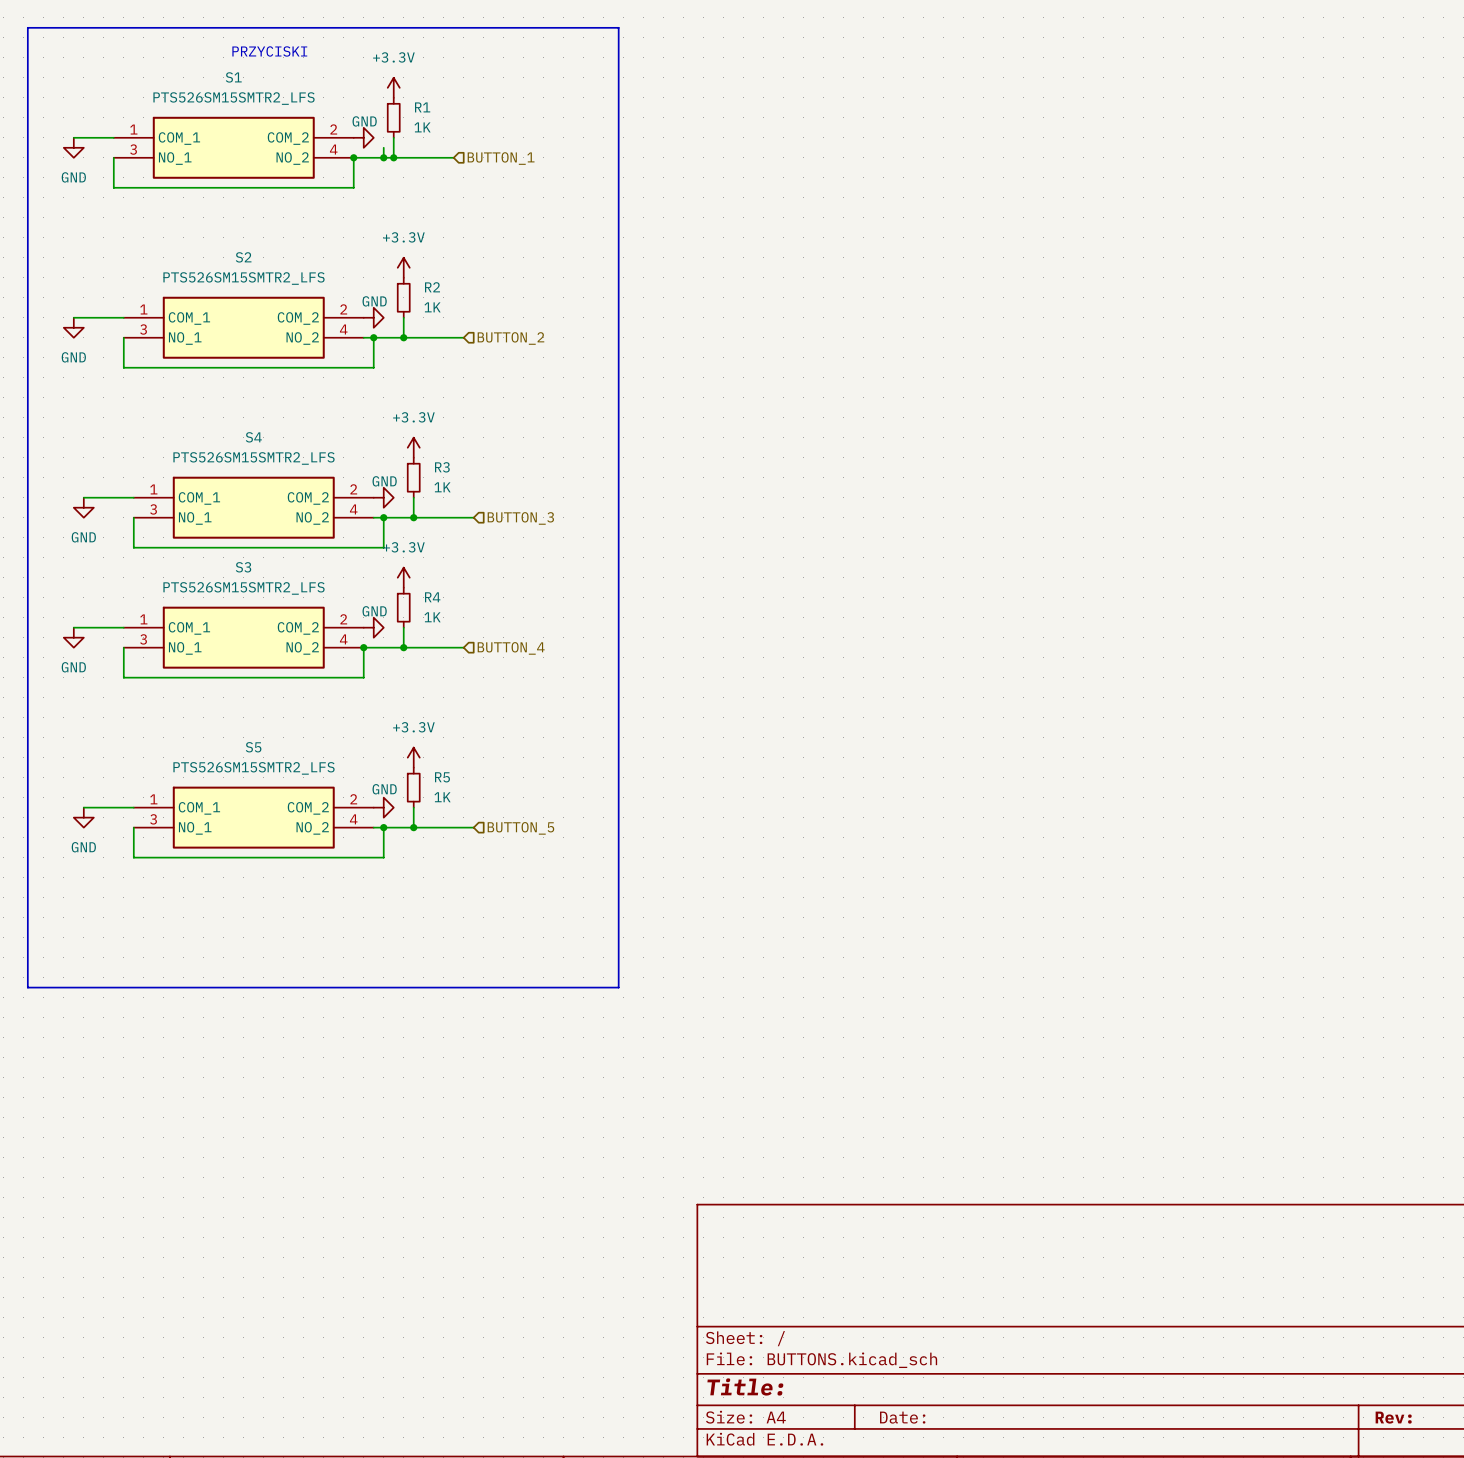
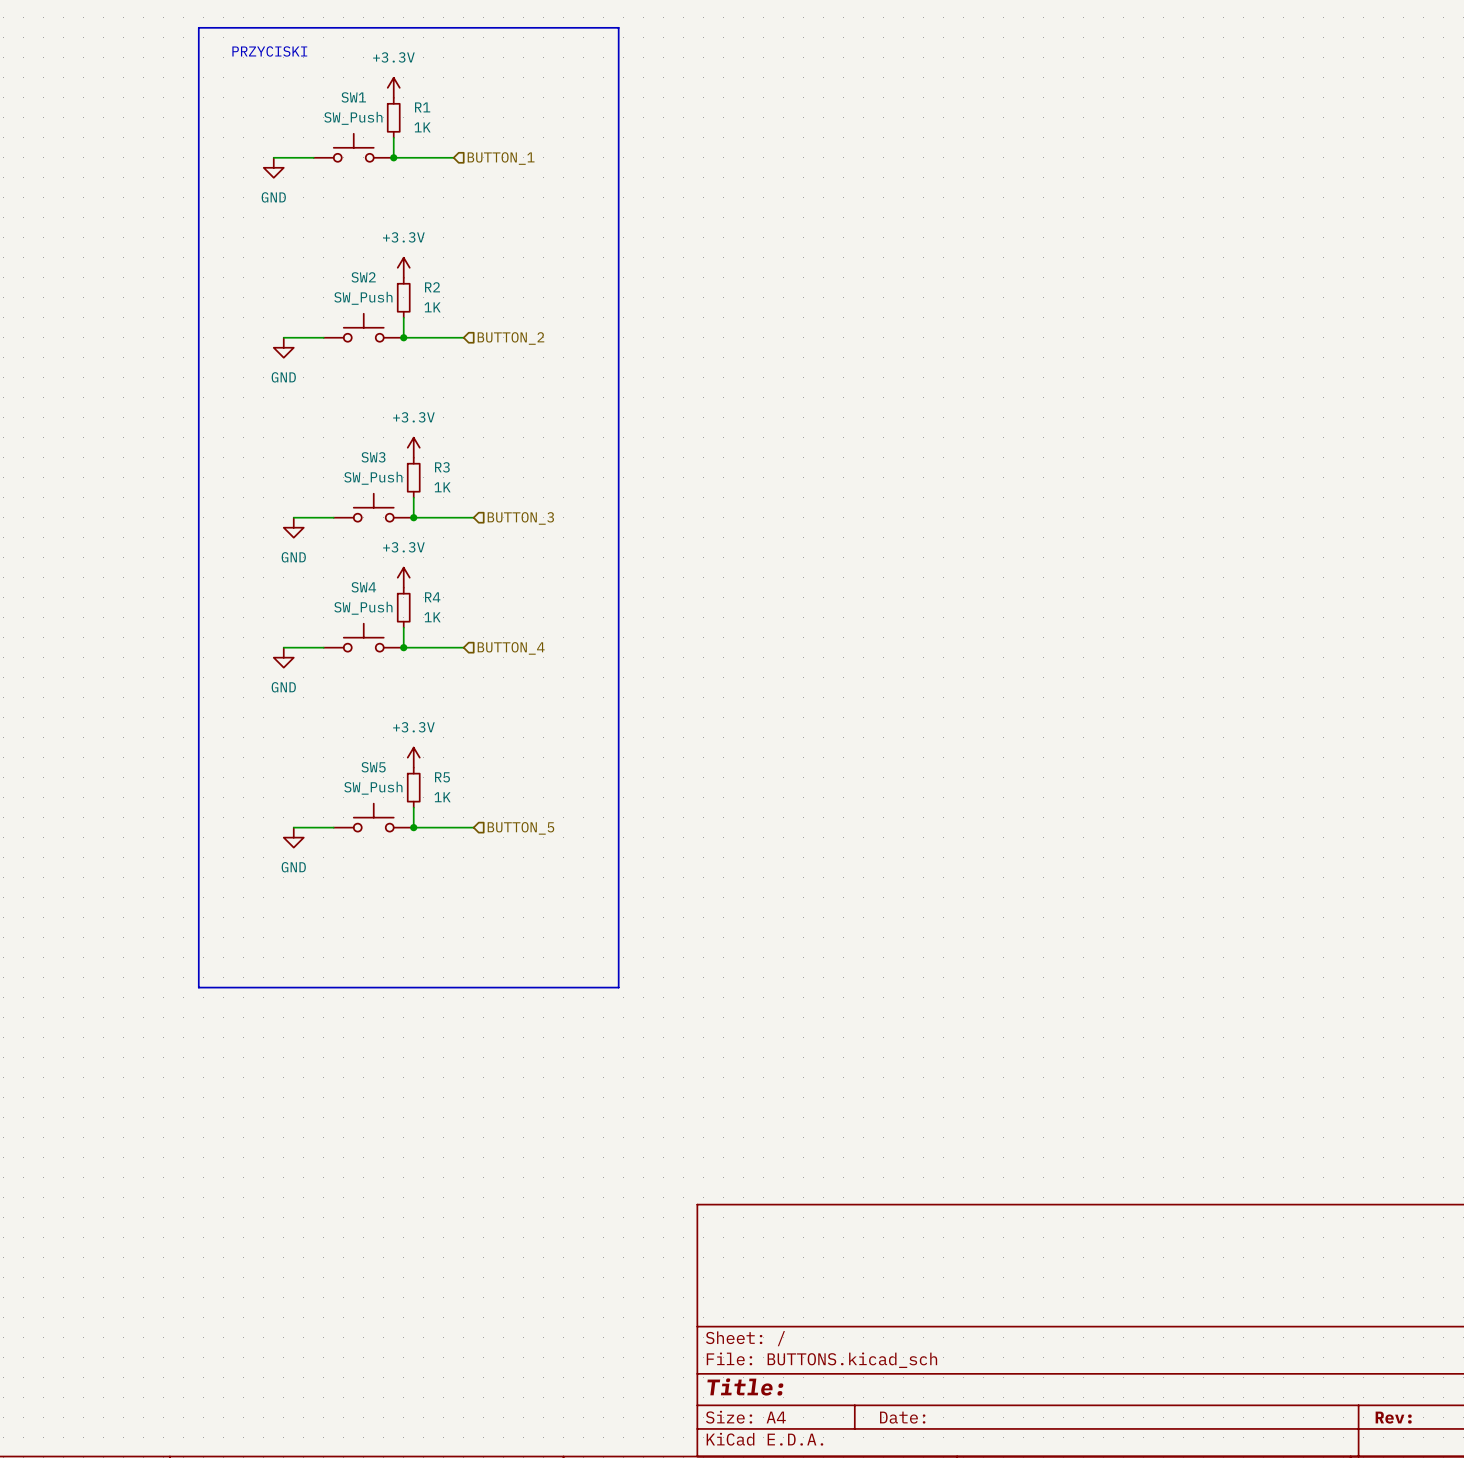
line: (198, 27) (27, 27) (27, 987) (198, 987) -> (198, 27) (198, 987)
wire: (73, 137) (113, 137) -> none
power symbol: GND (363, 137) -> none
power symbol: GND (73, 147) -> none
S1: PTS526SM15SMTR2_LFS (233, 147) -> none
SW1: none -> SW_Push (353, 147)
wire: (383, 147) (383, 157) -> none
wire: (113, 157) (113, 187) (353, 187) (353, 157) (393, 157) -> none
junction: (353, 157) -> none
junction: (383, 157) -> none
power symbol: none -> GND (273, 167)
wire: (73, 317) (123, 317) -> none
power symbol: GND (373, 317) -> none
power symbol: GND (73, 327) -> none
S2: PTS526SM15SMTR2_LFS (243, 327) -> none
SW2: none -> SW_Push (363, 327)
wire: (123, 337) (123, 367) (373, 367) (373, 337) -> none
junction: (373, 337) -> none
power symbol: none -> GND (283, 347)
wire: (83, 497) (133, 497) -> none
power symbol: GND (383, 497) -> none
power symbol: GND (83, 507) -> none
S4: PTS526SM15SMTR2_LFS (253, 507) -> none
SW3: none -> SW_Push (373, 507)
wire: (133, 517) (133, 547) (383, 547) (383, 517) -> none
junction: (383, 517) -> none
power symbol: none -> GND (293, 527)
wire: (73, 627) (123, 627) -> none
power symbol: GND (373, 627) -> none
power symbol: GND (73, 637) -> none
S3: PTS526SM15SMTR2_LFS (243, 637) -> none
SW4: none -> SW_Push (363, 637)
wire: (123, 647) (123, 677) (363, 677) (363, 647) (403, 647) -> none
junction: (363, 647) -> none
power symbol: none -> GND (283, 657)
wire: (83, 807) (133, 807) -> none
power symbol: GND (383, 807) -> none
power symbol: GND (83, 817) -> none
S5: PTS526SM15SMTR2_LFS (253, 817) -> none
SW5: none -> SW_Push (373, 817)
wire: (133, 827) (133, 857) (383, 857) (383, 827) -> none
junction: (383, 827) -> none
power symbol: none -> GND (293, 837)

